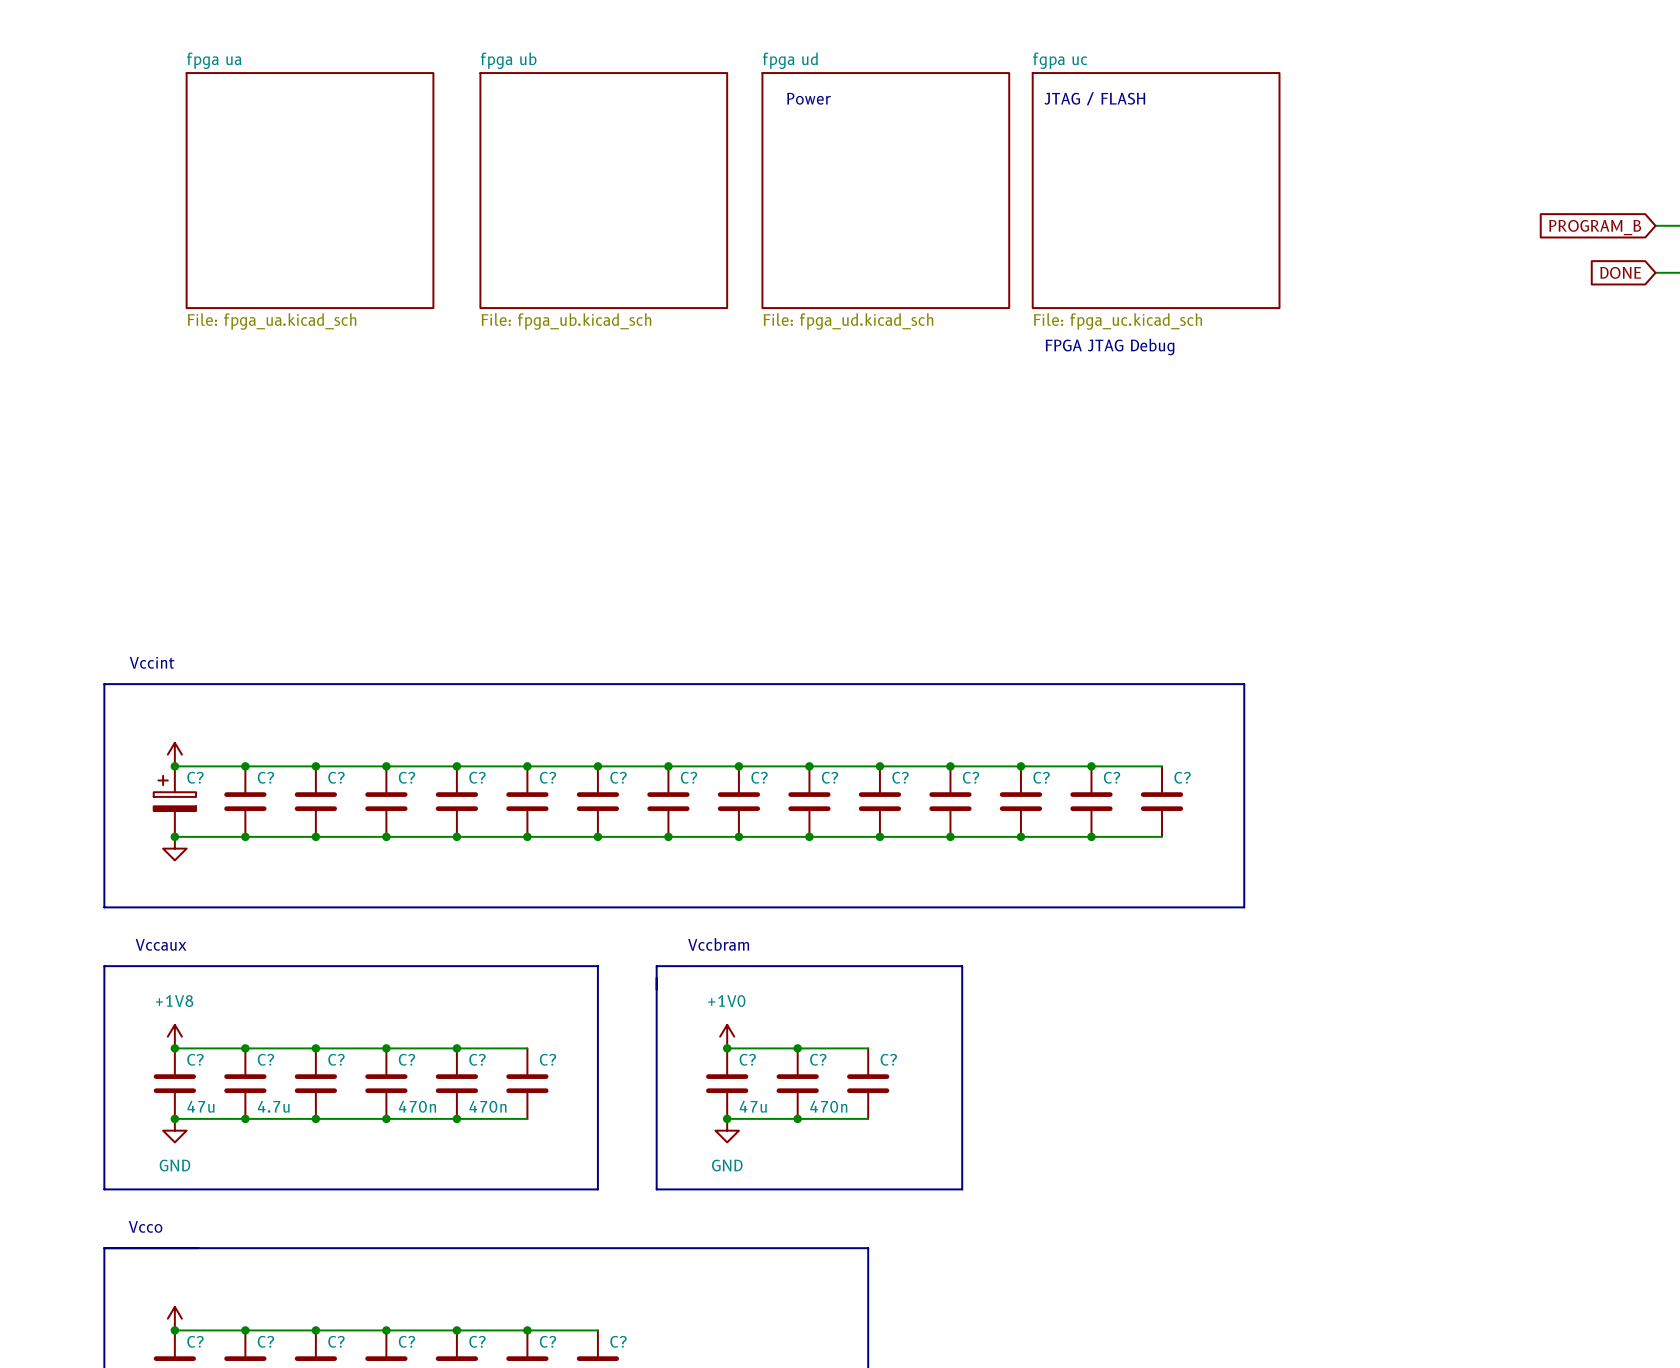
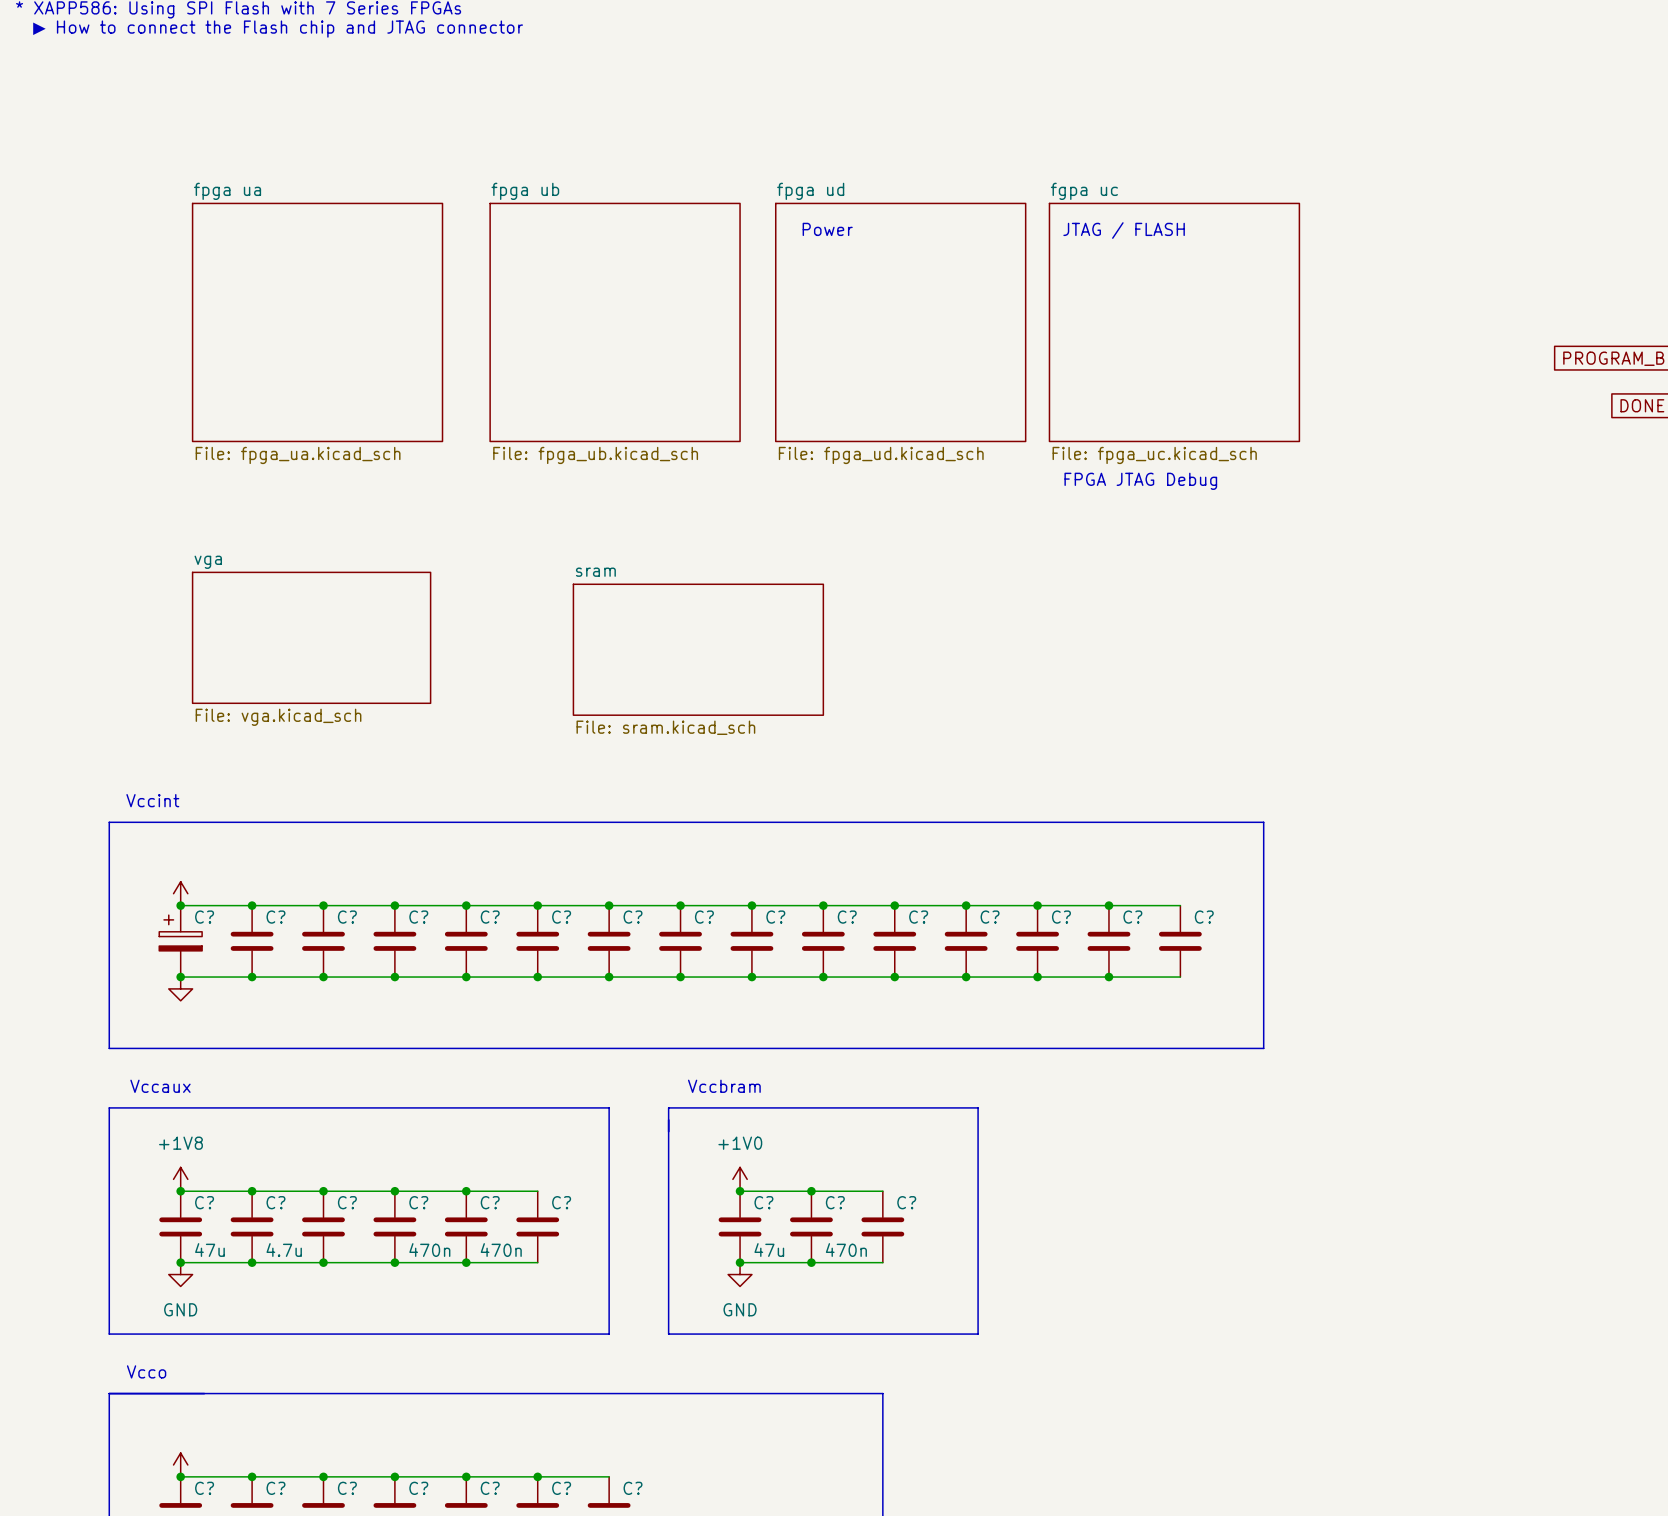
sheet vga: none -> File: vga.kicad_sch (311, 637)
sheet sram: none -> File: sram.kicad_sch (698, 649)

